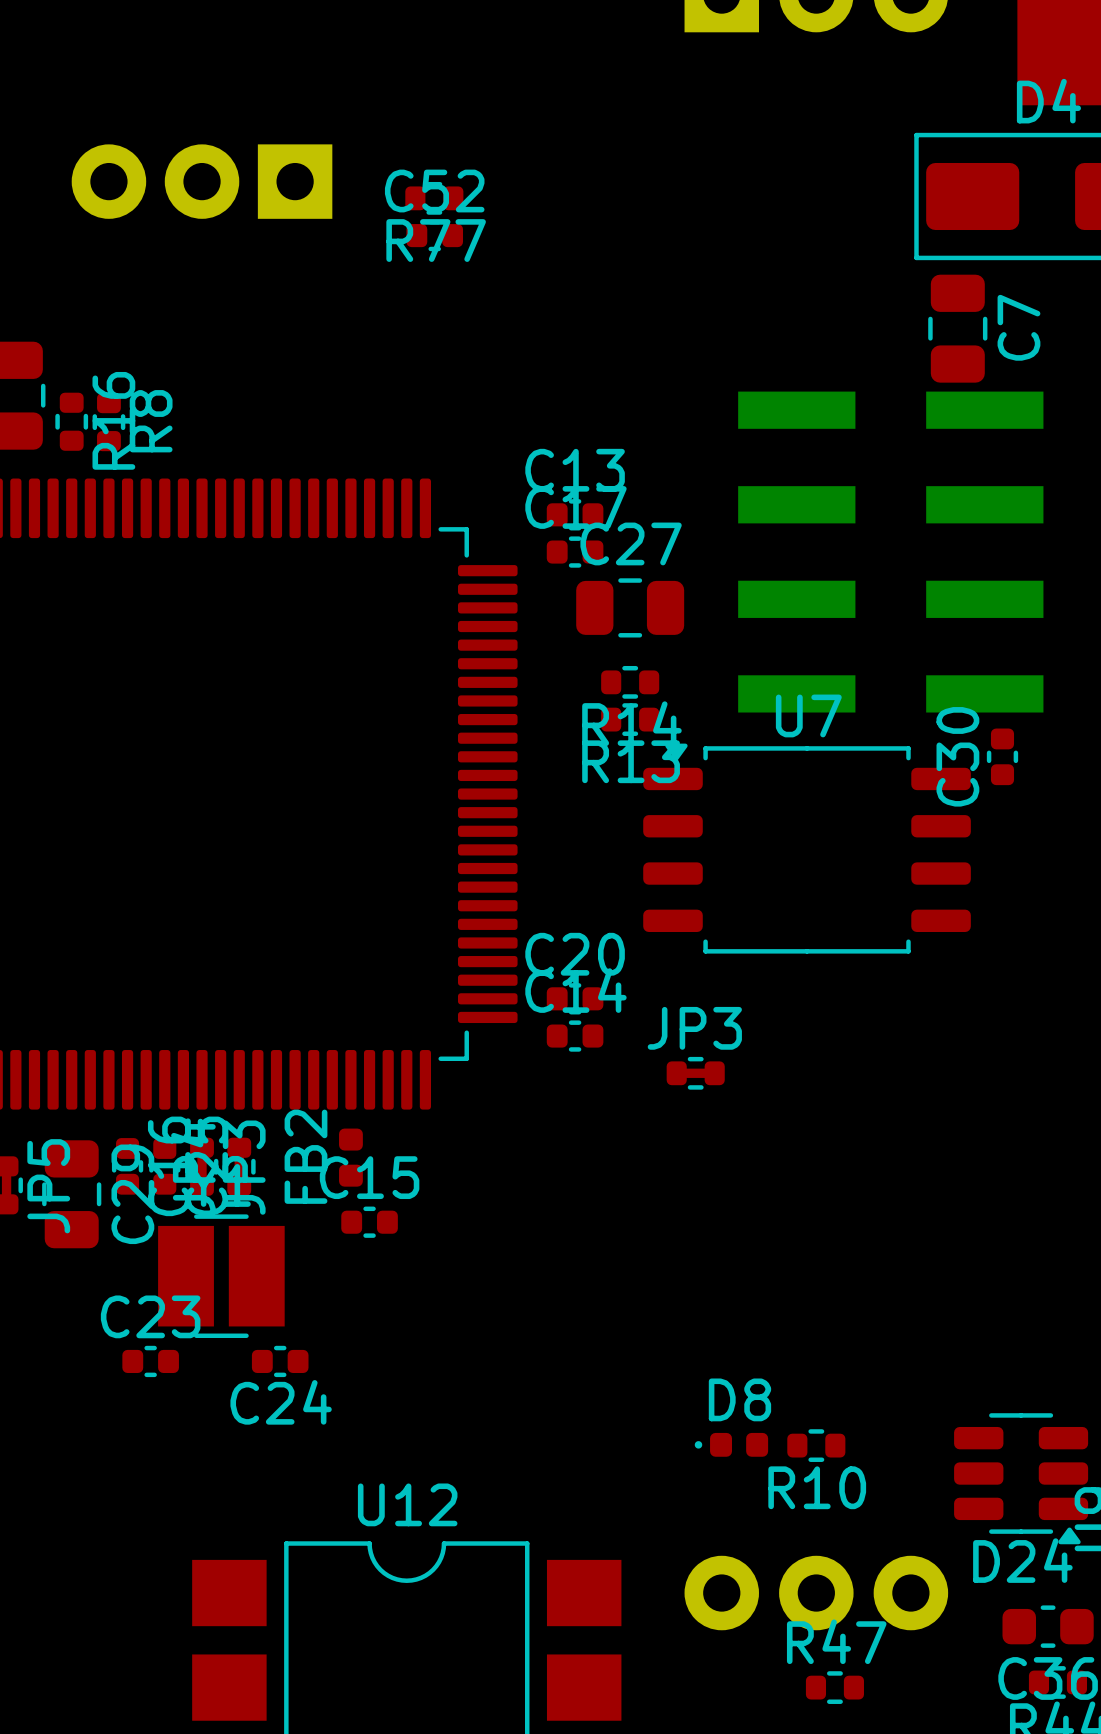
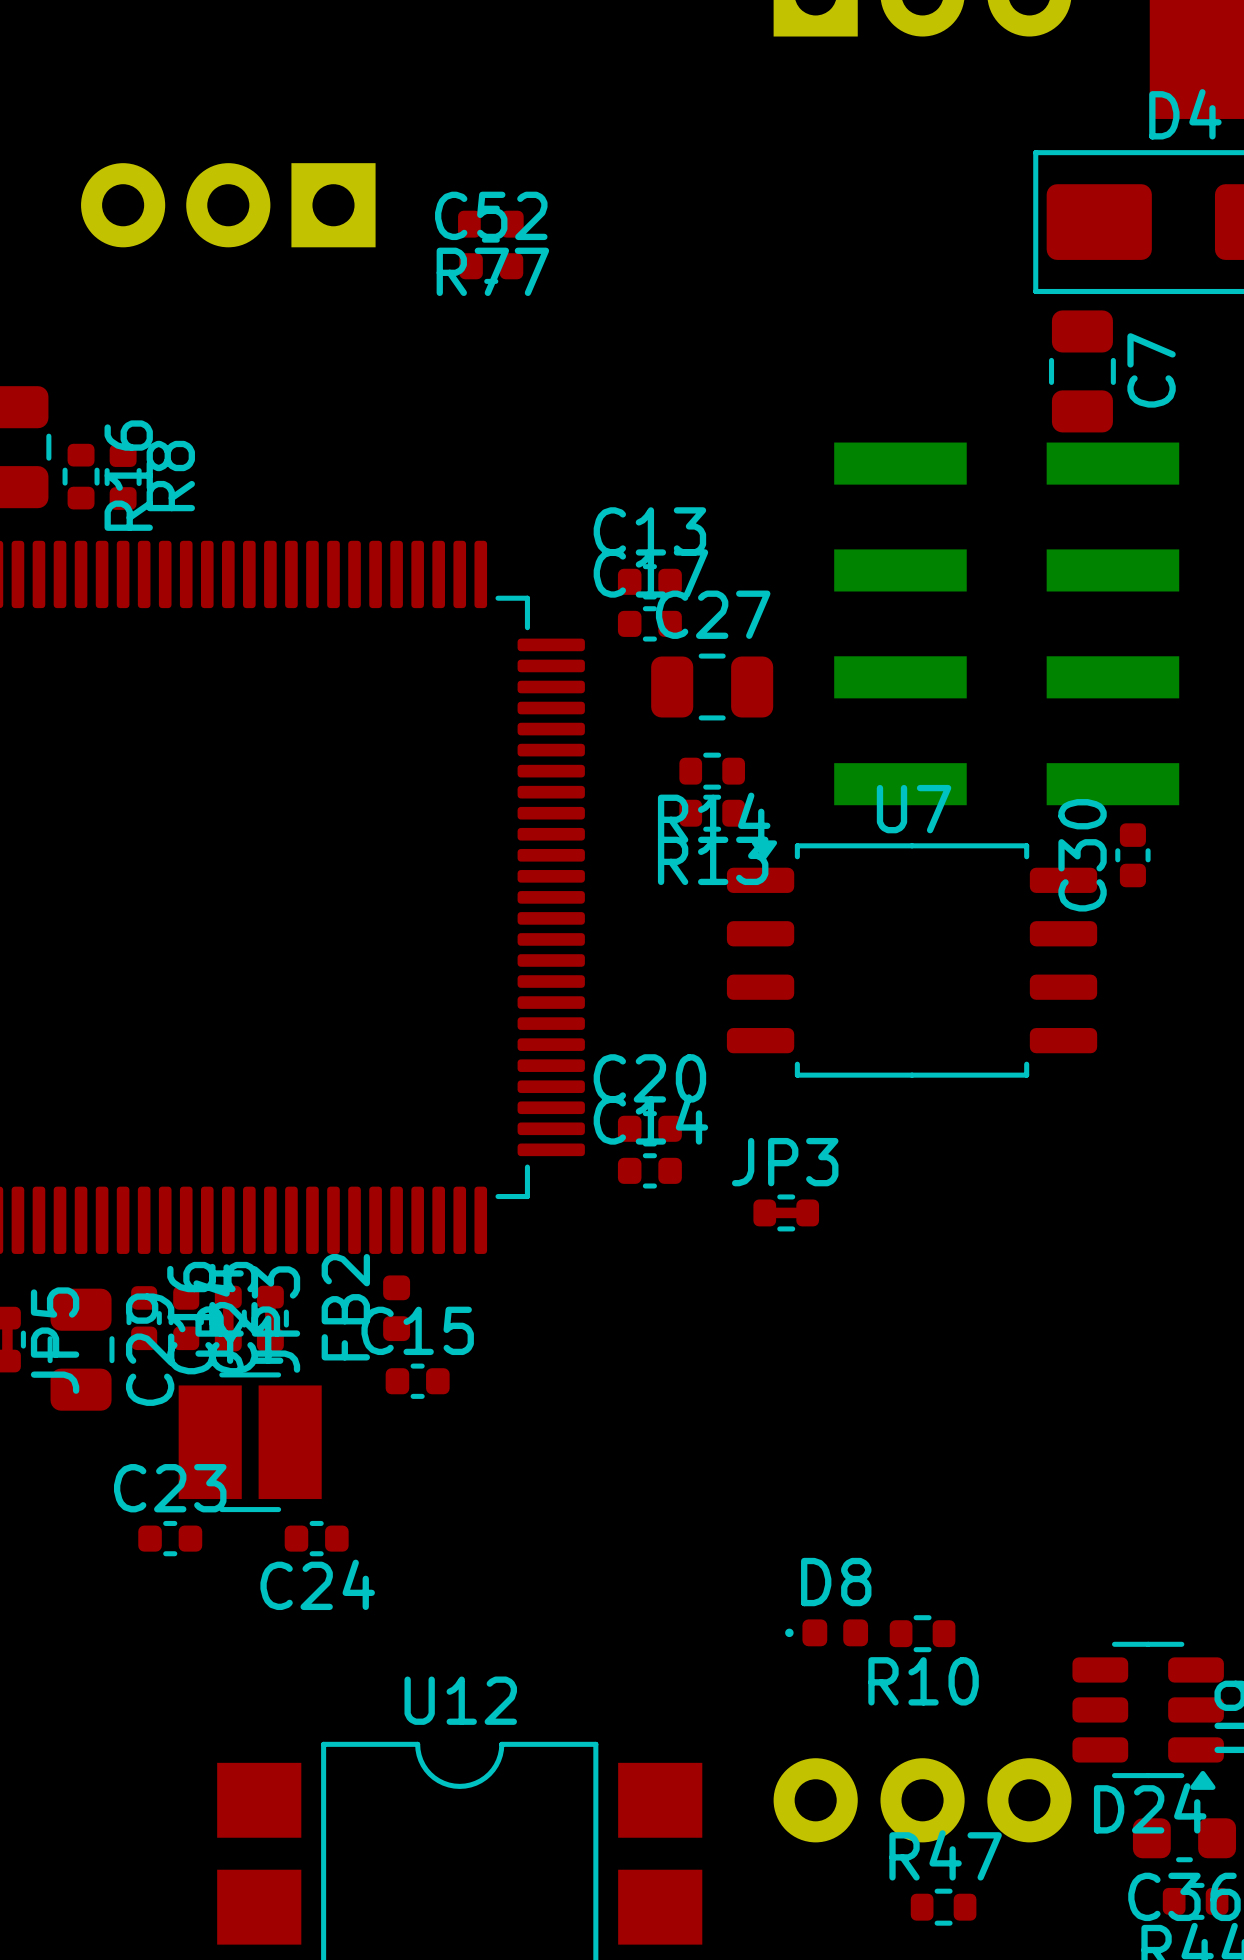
D24 position: (1021, 1478) -> (1148, 1715)

